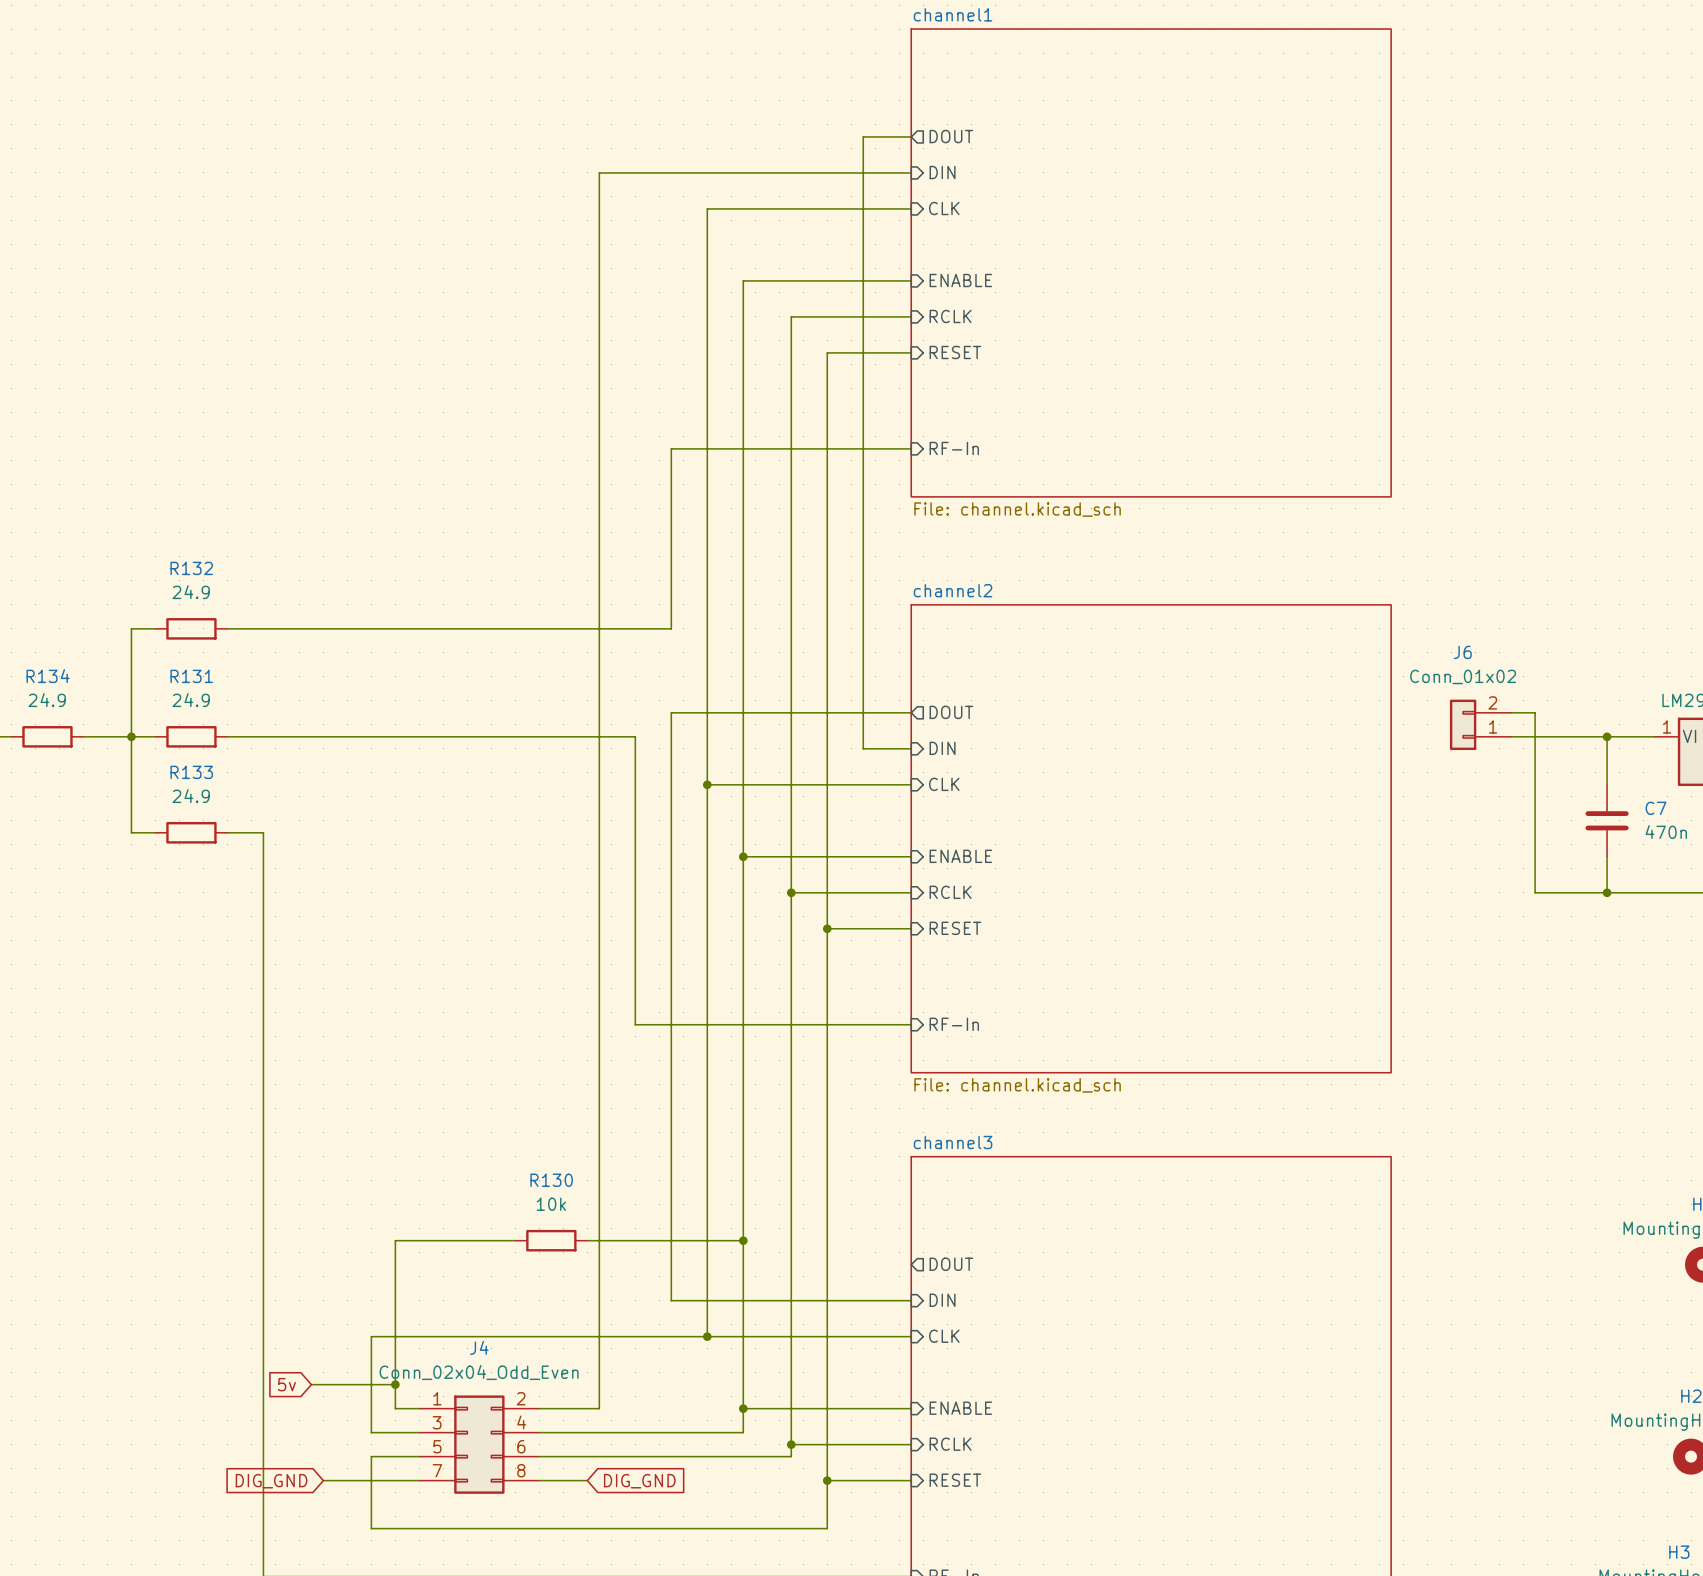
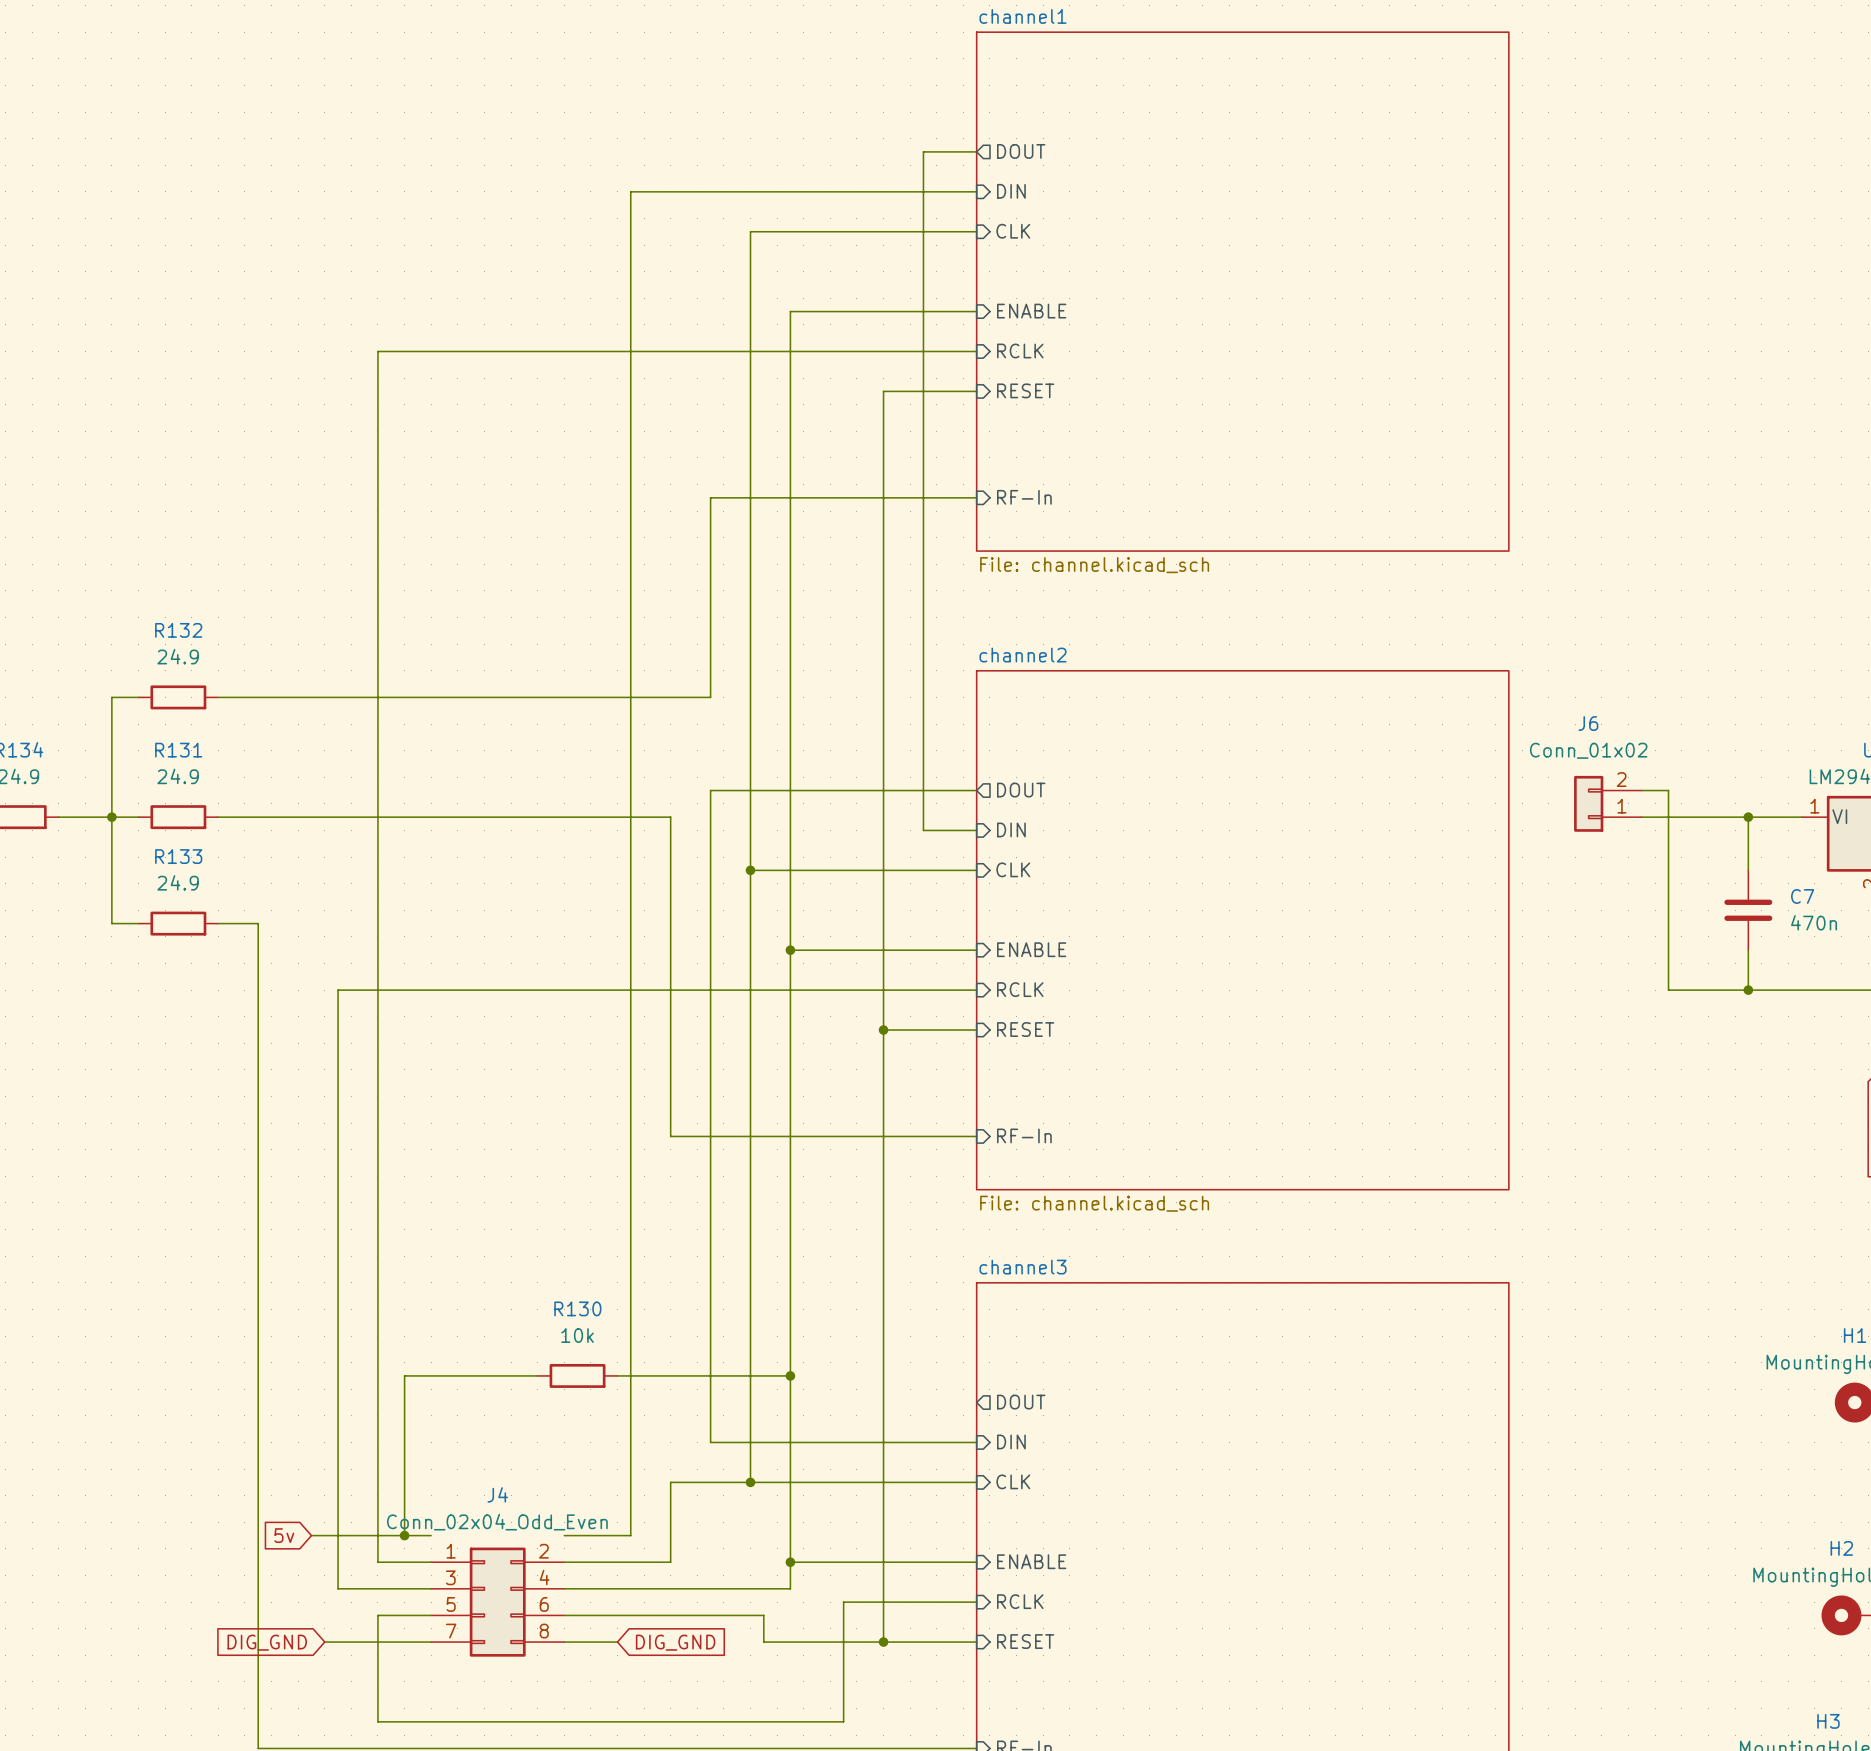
wire: (791, 316) (791, 1444) -> (843, 351) (377, 351) (377, 1482)
wire: none -> (843, 990) (338, 990) (338, 1588) (377, 1588)
junction: (791, 892) -> none
wire: (371, 1336) (635, 1336) -> none
wire: (395, 1384) (395, 1408) -> (404, 1535) (431, 1535)
wire: none -> (564, 1535) (630, 1535)
wire: (599, 1384) (599, 1408) -> (670, 1482) (670, 1562) (630, 1562)
wire: (371, 1408) (371, 1432) -> (377, 1562) (404, 1562)
junction: (791, 1444) -> none
wire: (719, 1456) (791, 1456) -> (763, 1615) (763, 1642) (883, 1642)
wire: (827, 1480) (827, 1528) (371, 1528) -> (843, 1615) (843, 1721) (377, 1721) (377, 1695)

